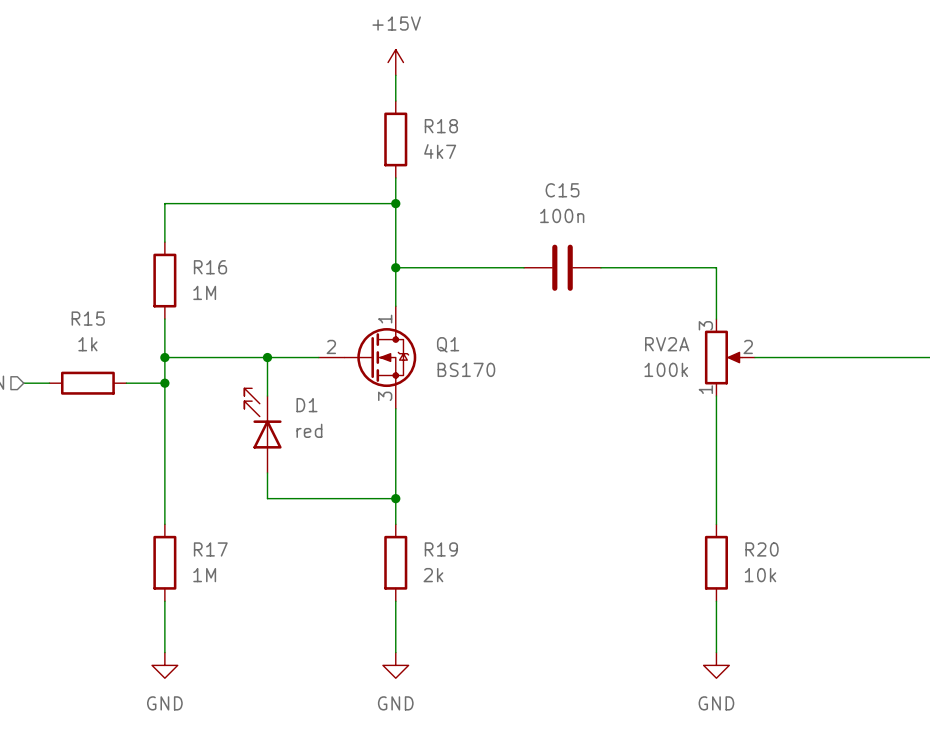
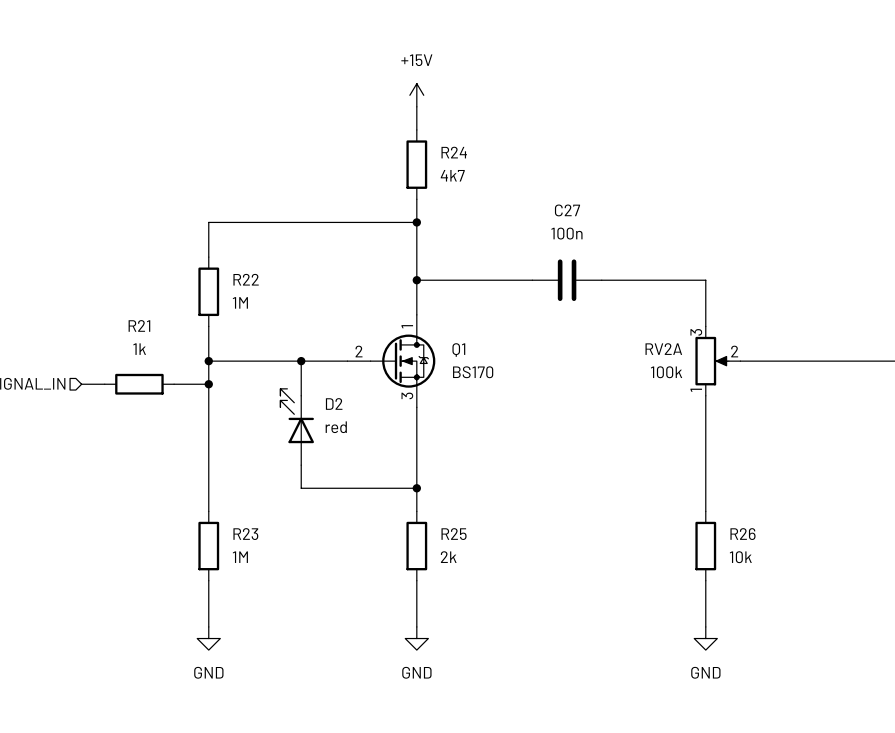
R18 name: R18 (441, 126) -> R24 (454, 152)
C15 name: C15 (562, 190) -> C27 (567, 210)
R16 name: R16 (210, 267) -> R22 (246, 279)
R15 name: R15 (88, 318) -> R21 (139, 325)
D1 name: D1 (306, 405) -> D2 (334, 403)
R17 name: R17 (210, 549) -> R23 (245, 534)
R19 name: R19 (441, 549) -> R25 (454, 534)
R20 name: R20 (762, 549) -> R26 (742, 534)

